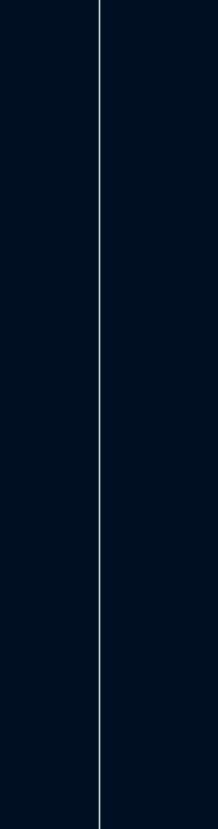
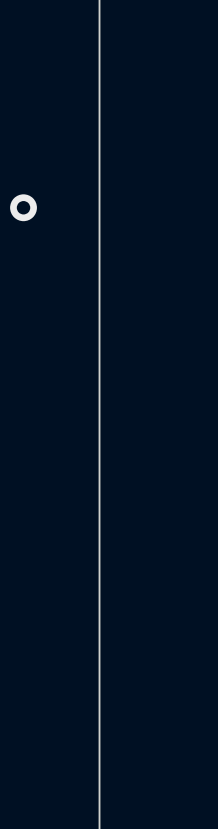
via: none -> (23, 207)

